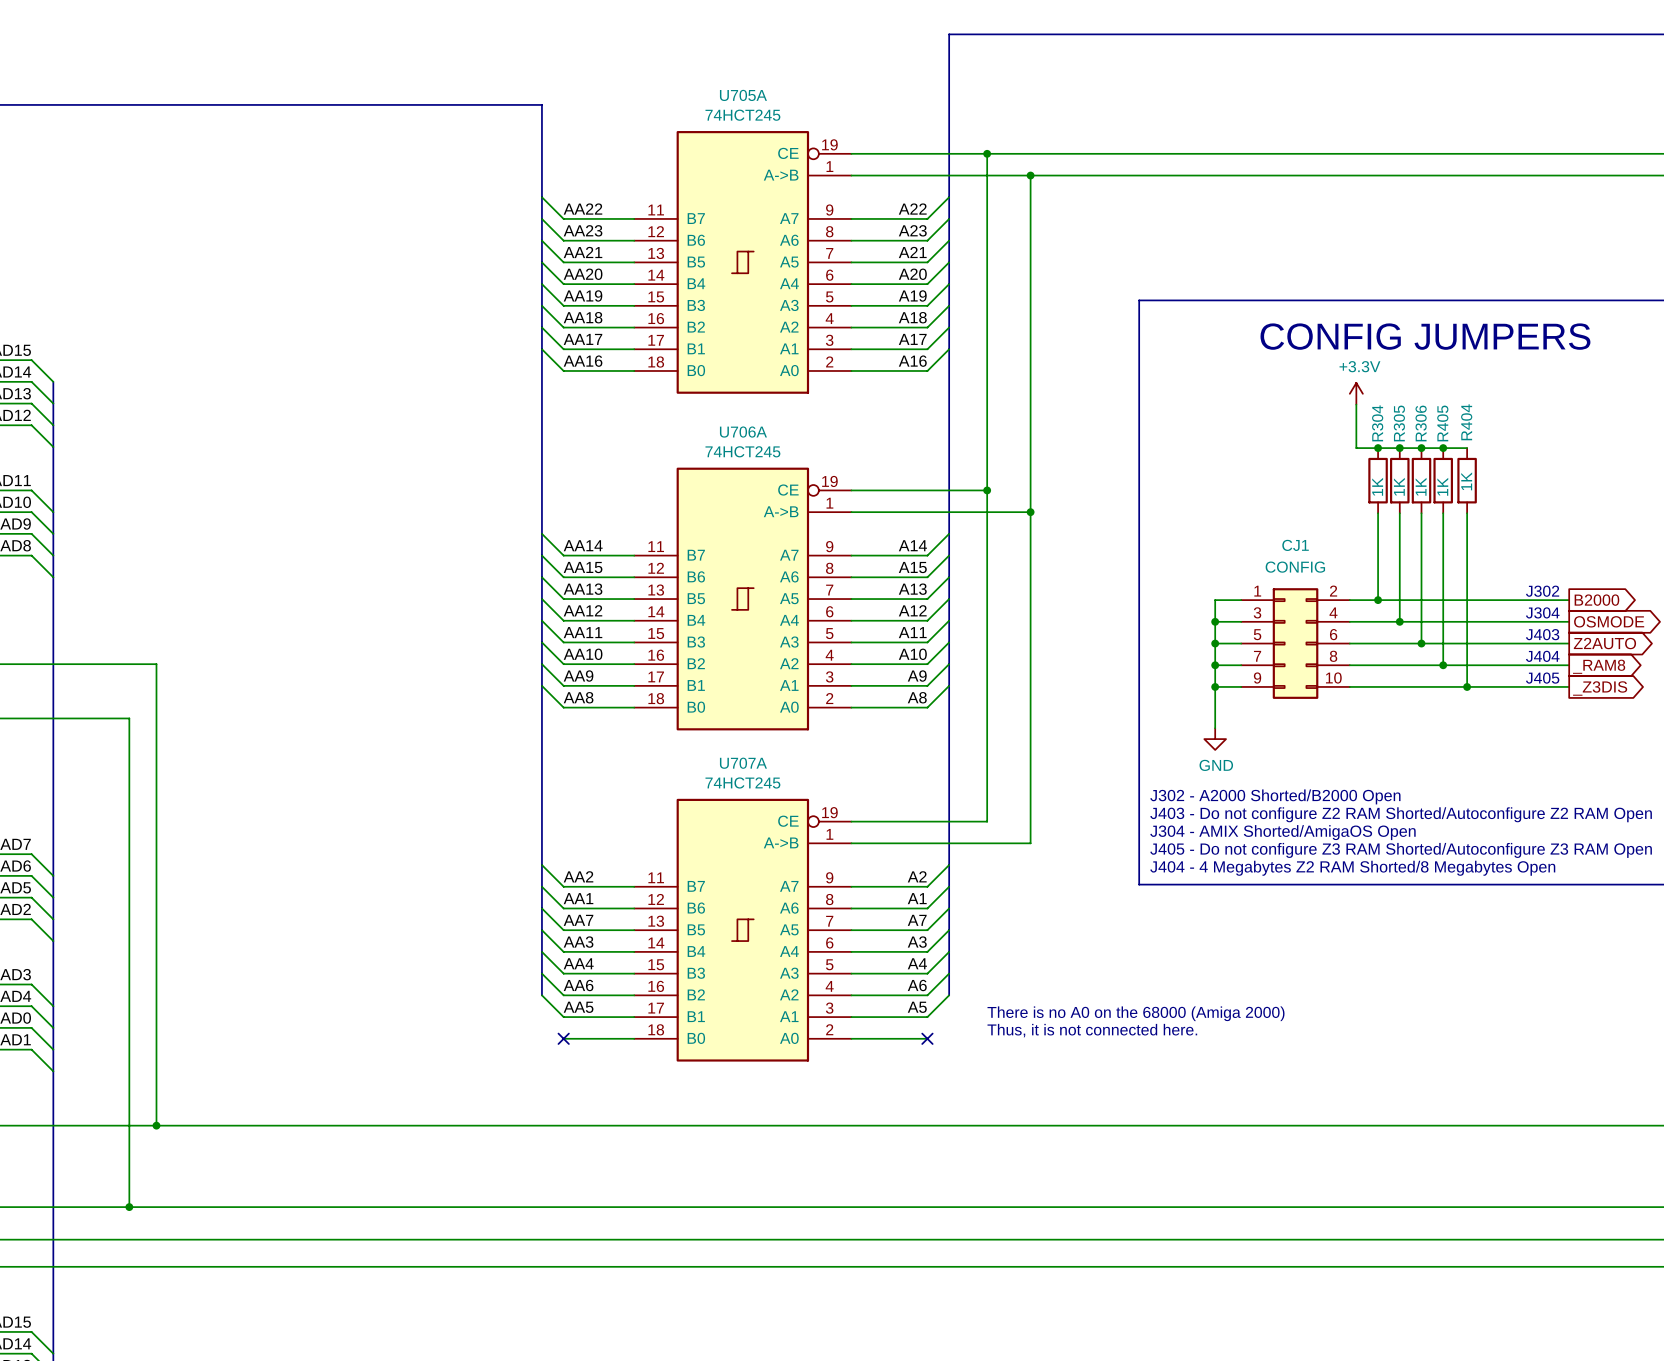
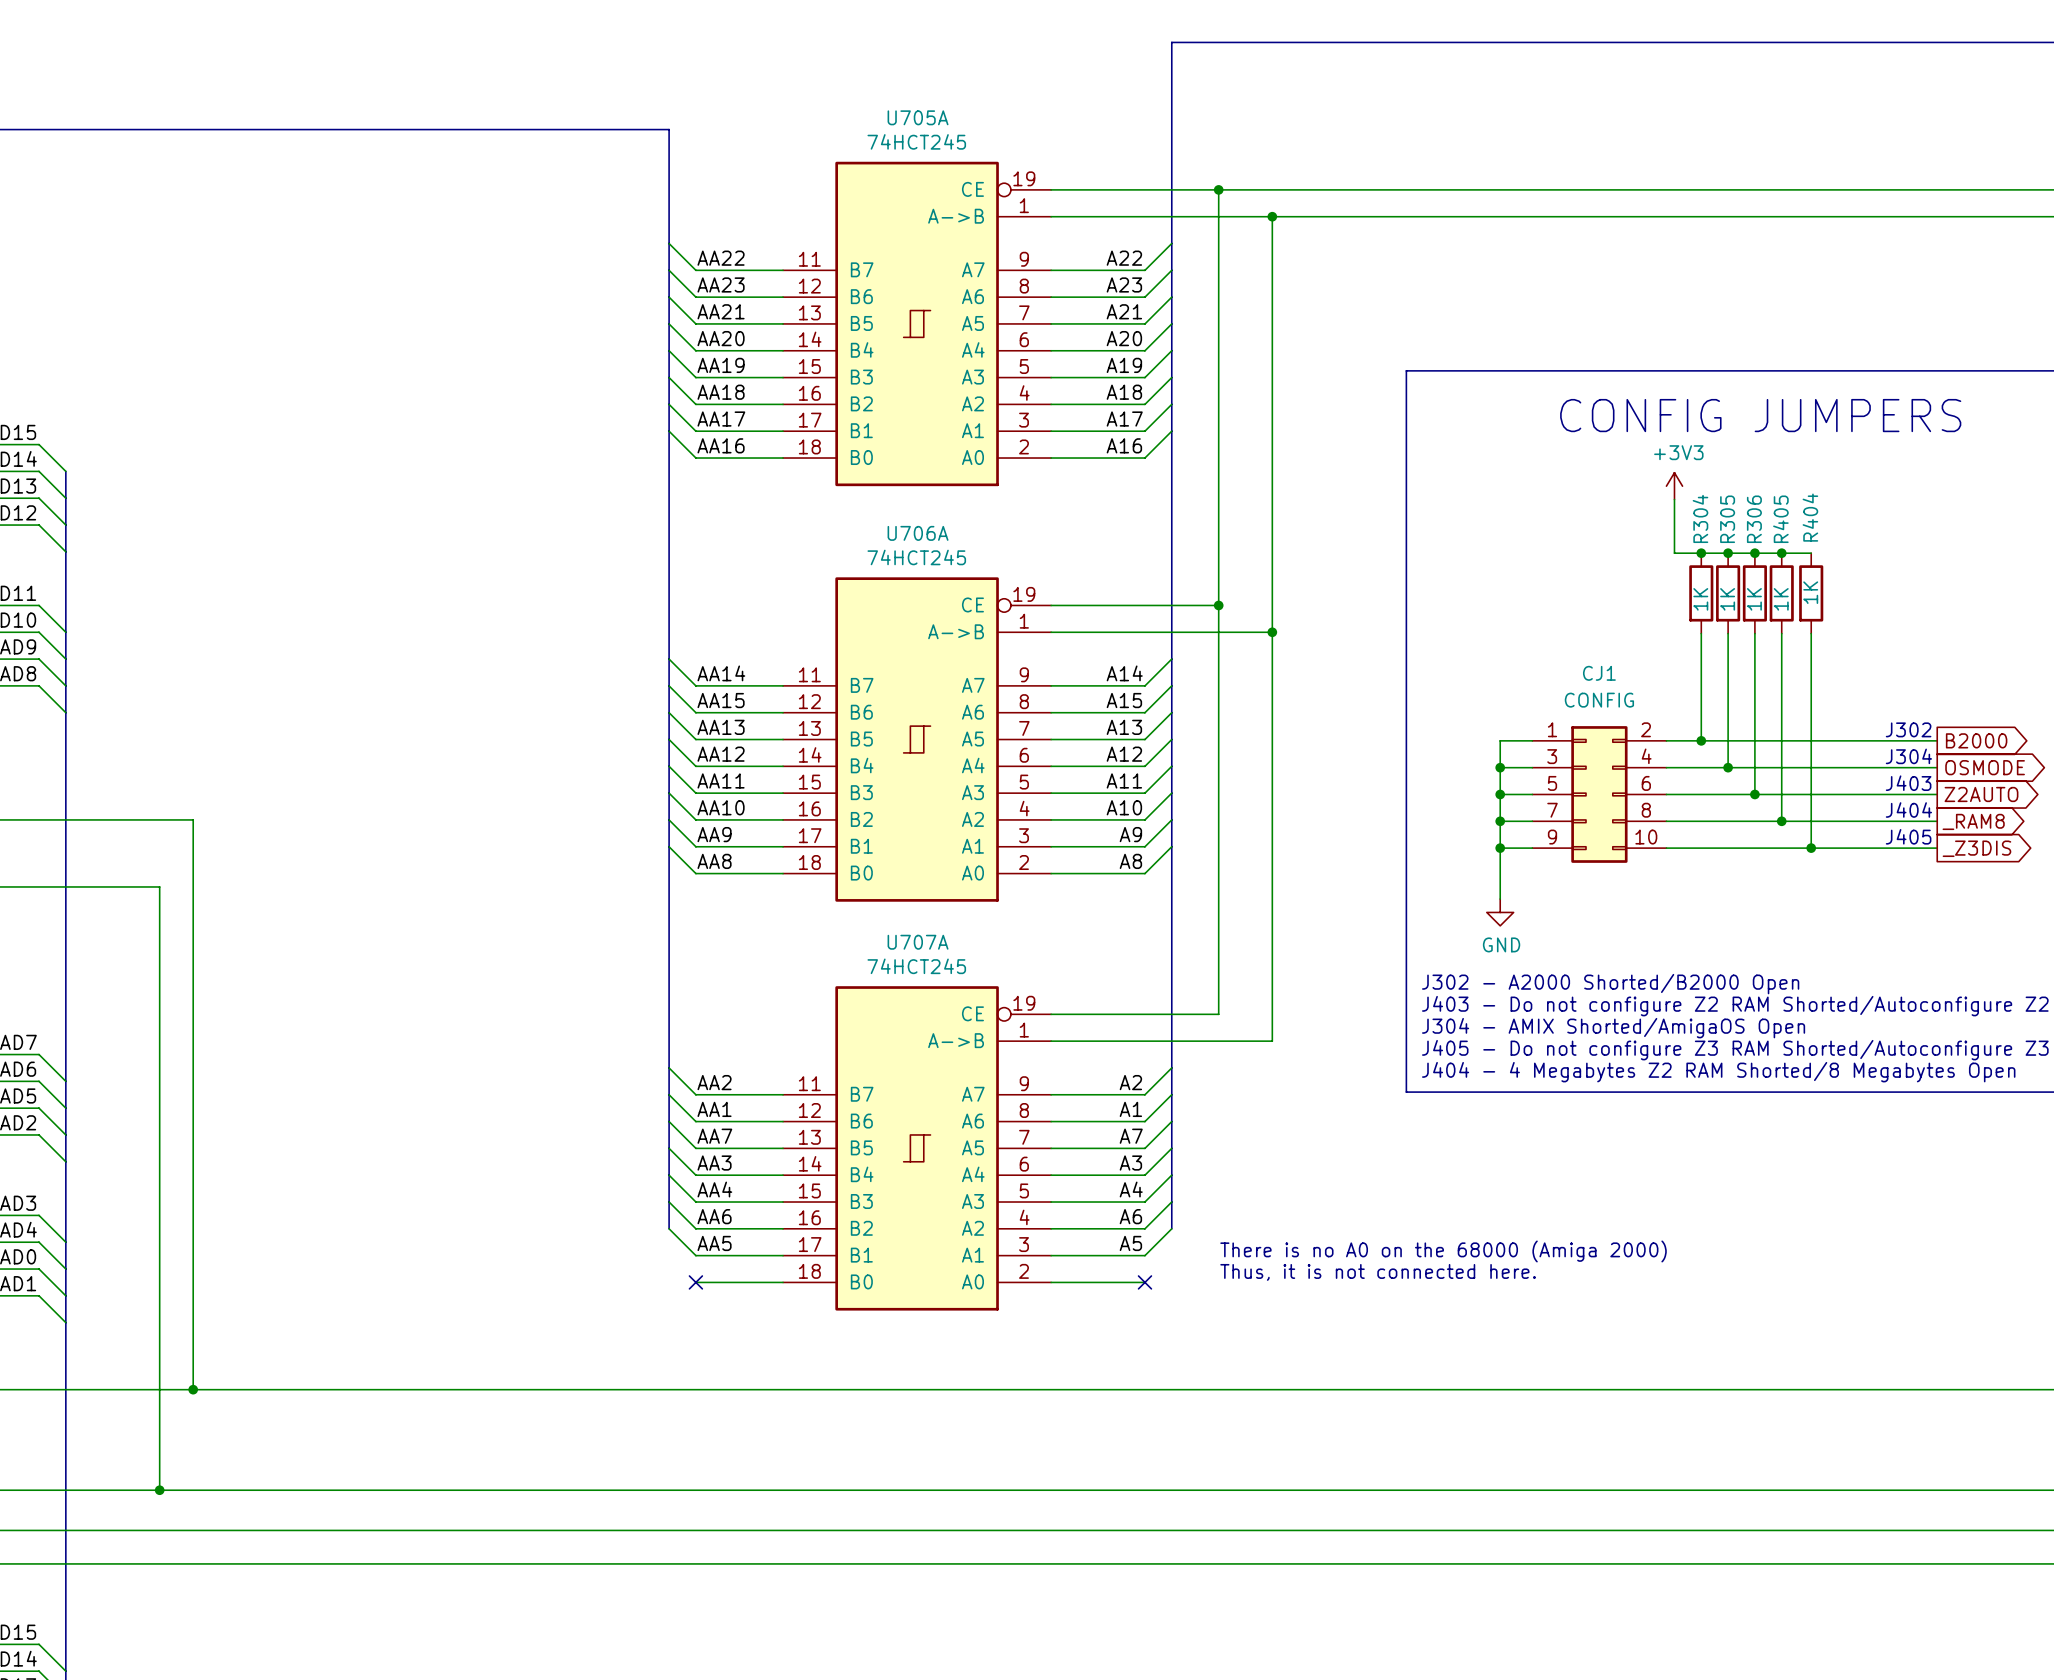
power symbol: +3.3V (1356, 393) -> +3V3 (1674, 486)

